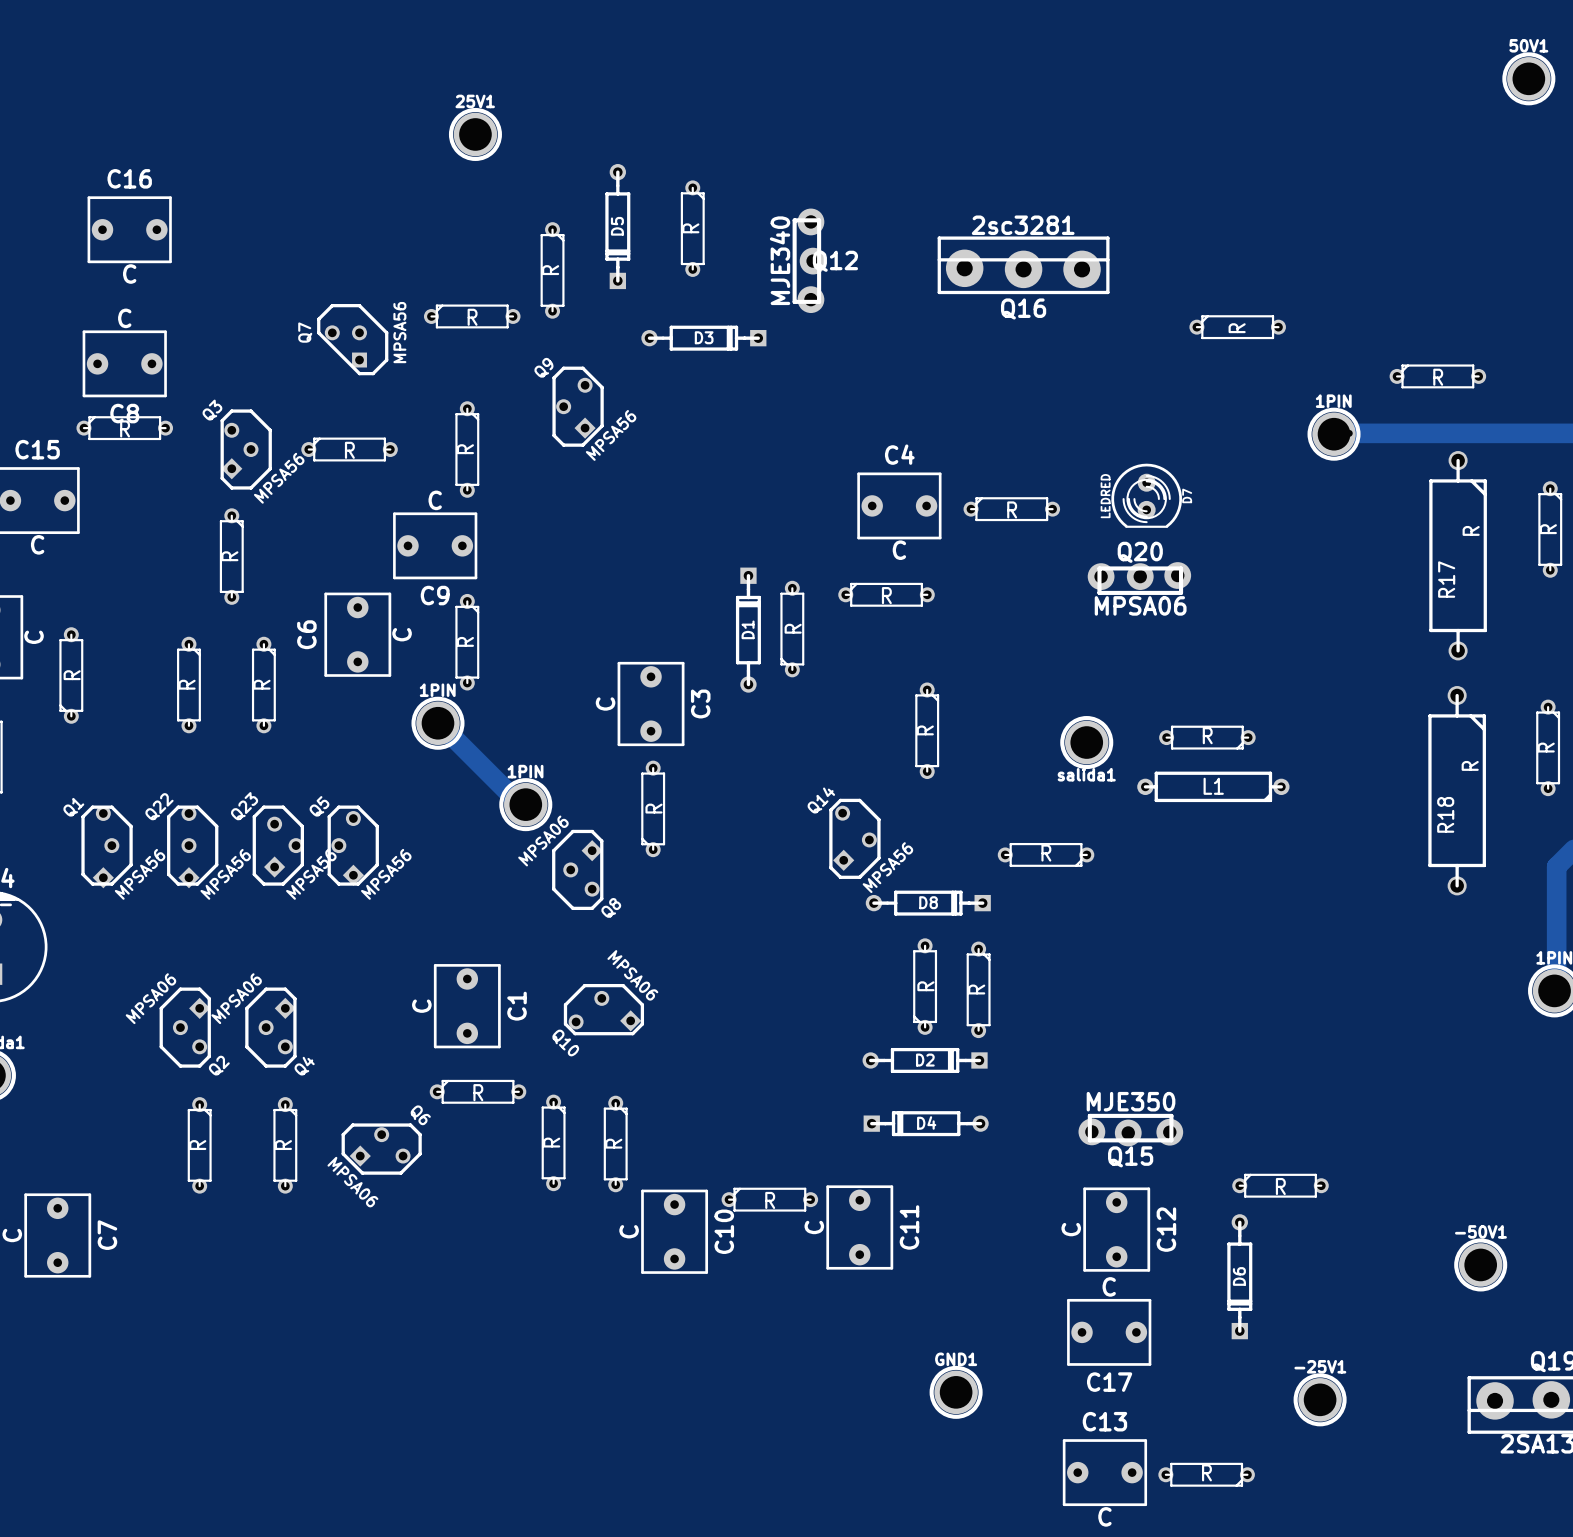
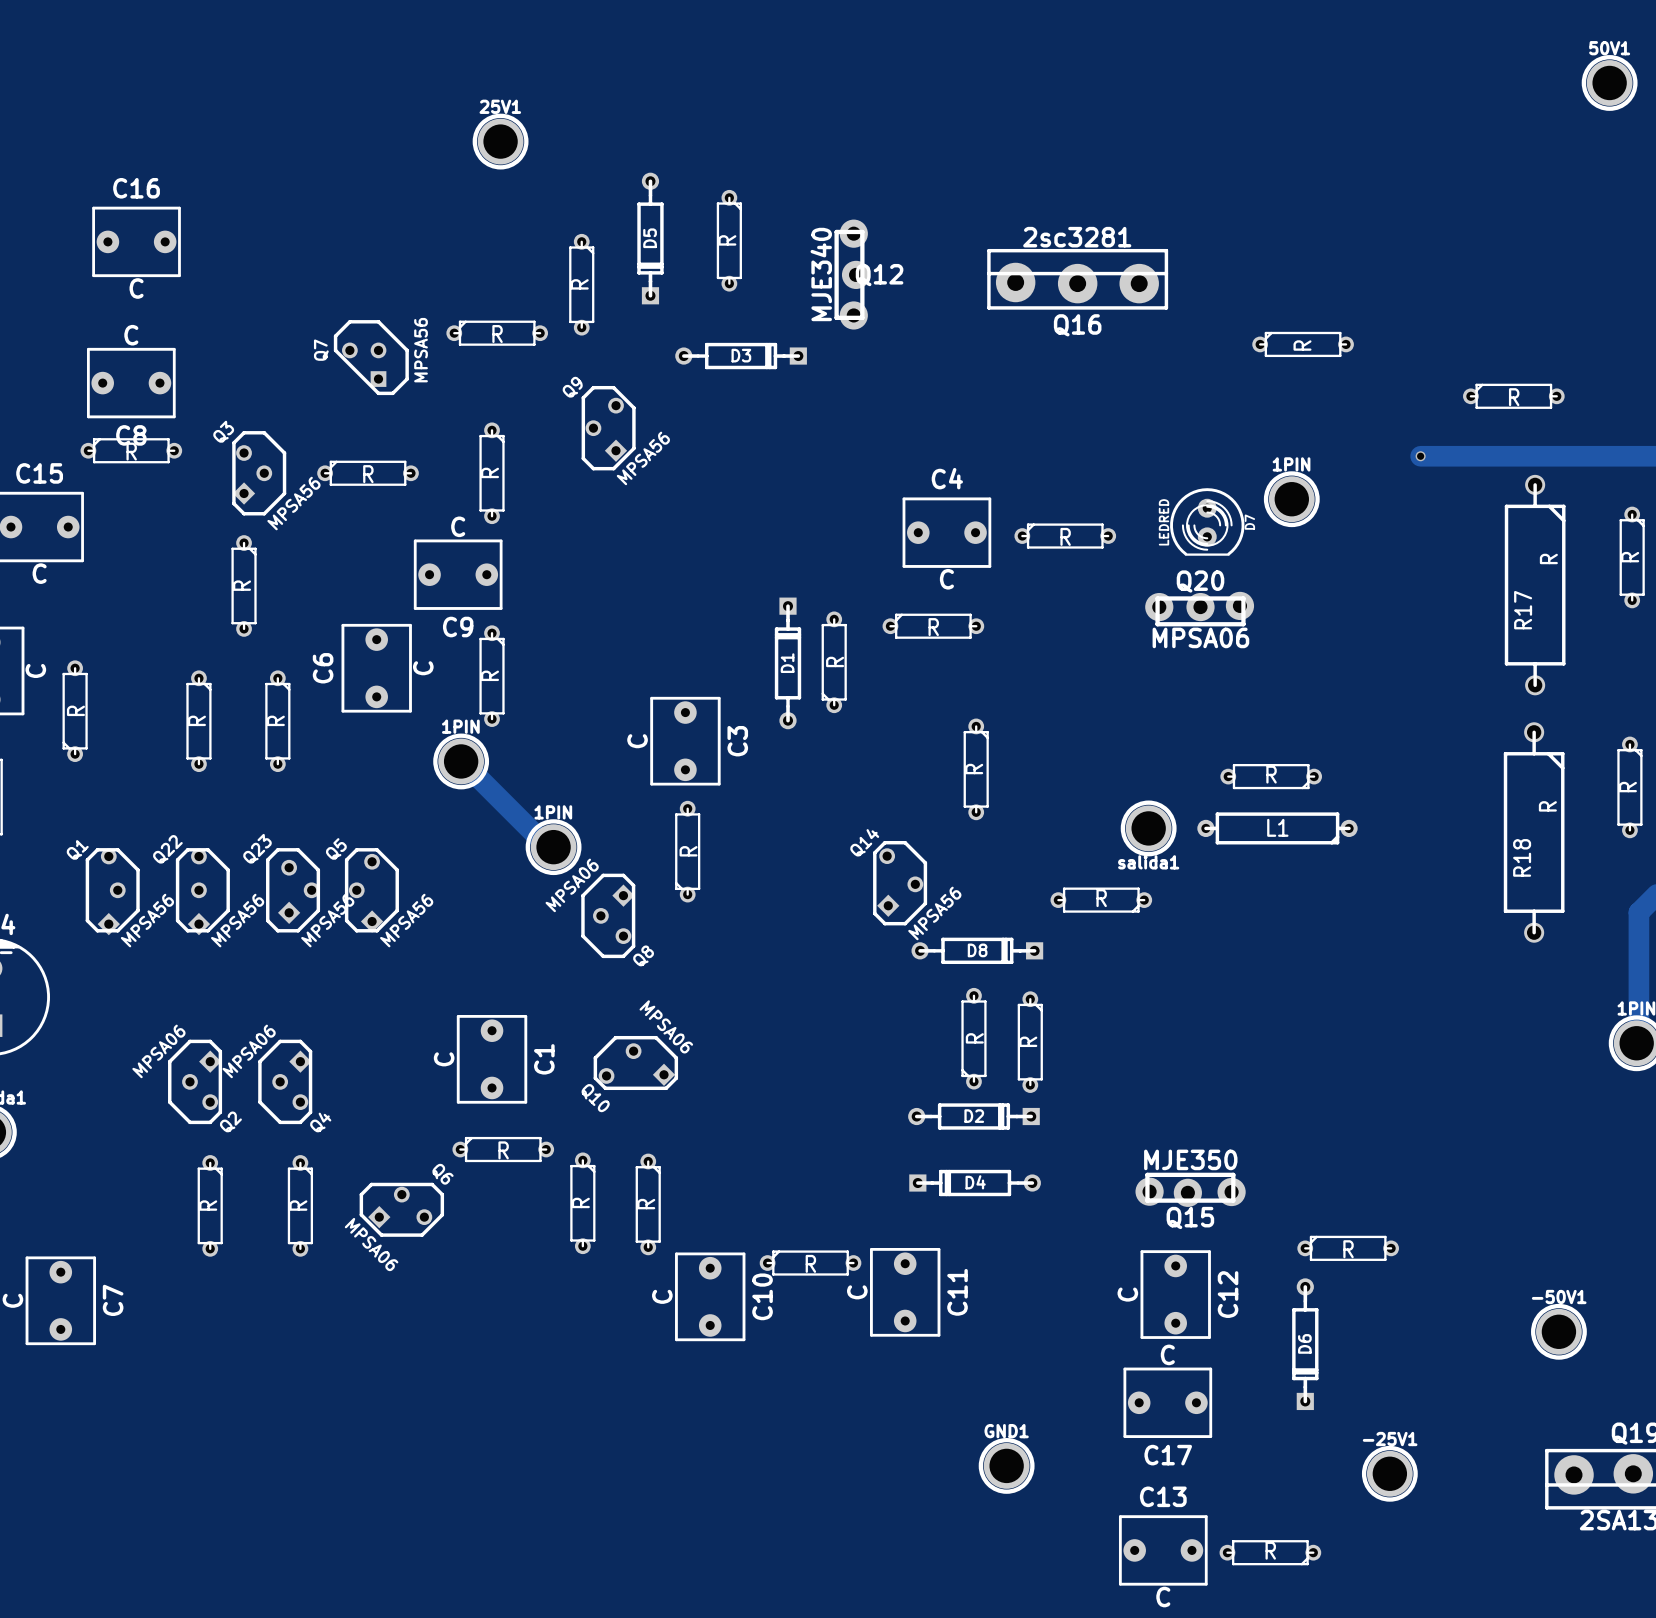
1PIN position: (1334, 434) -> (1291, 499)
salida1 position: (1086, 742) -> (1148, 828)

